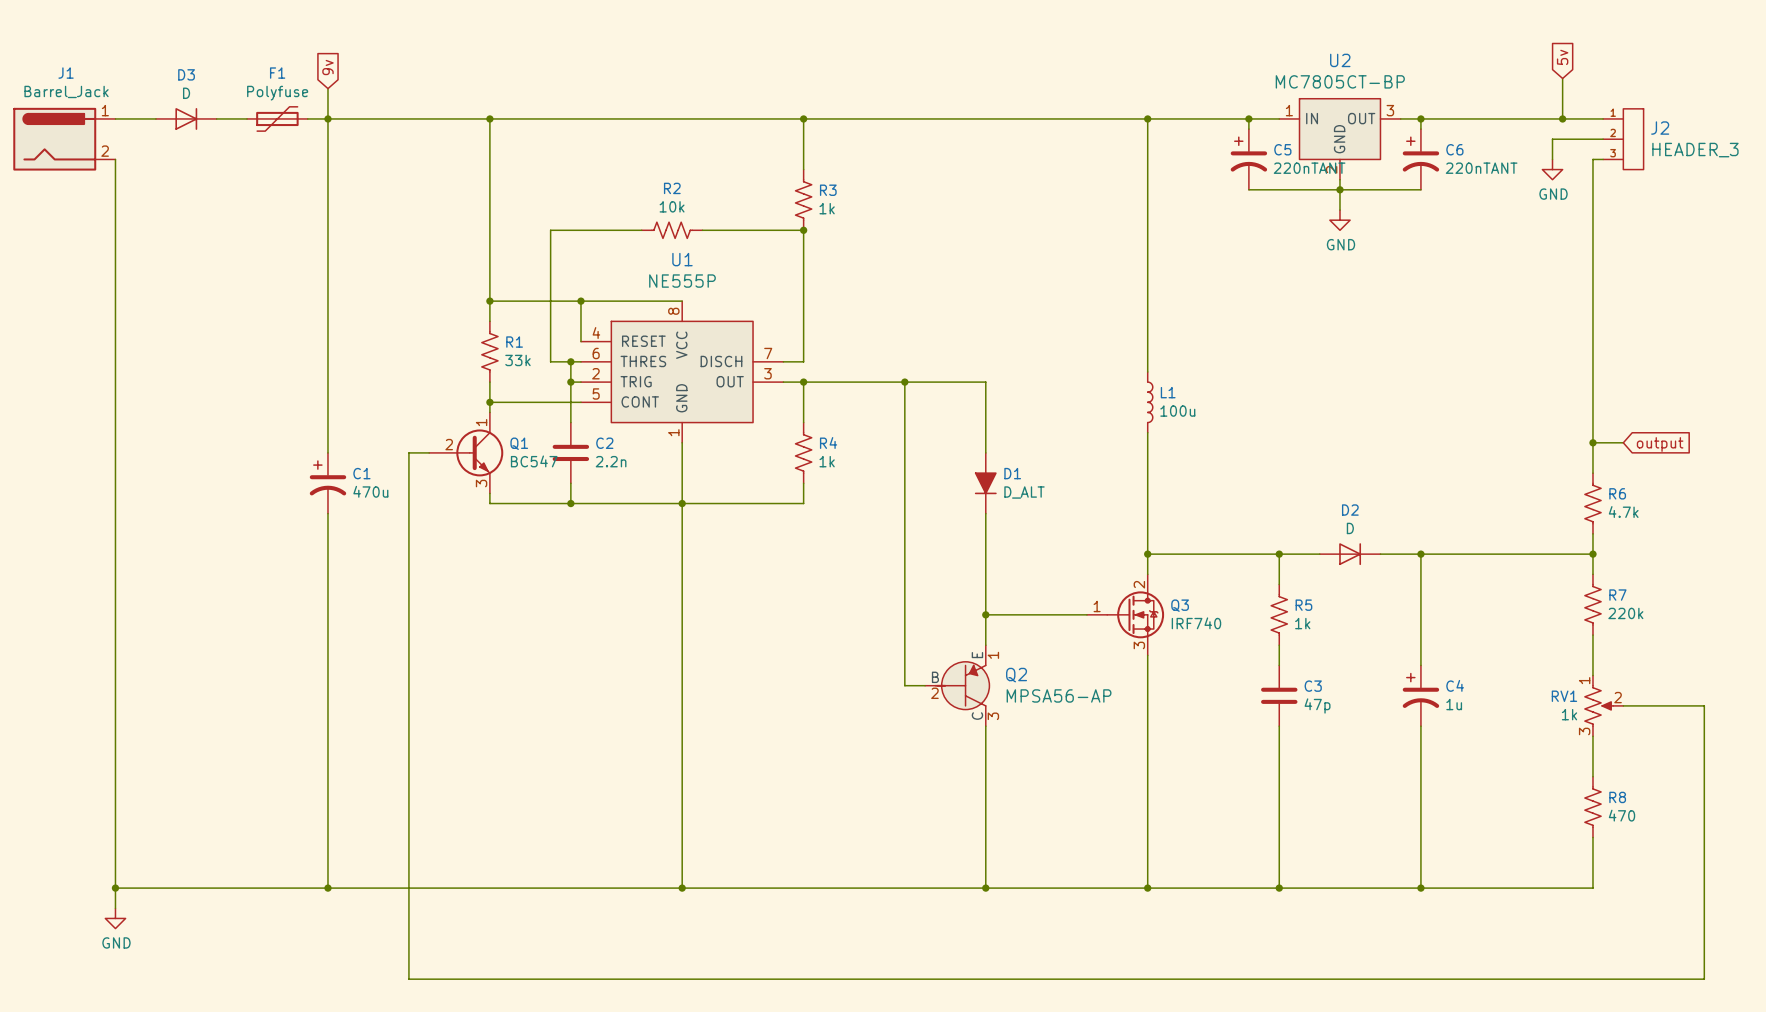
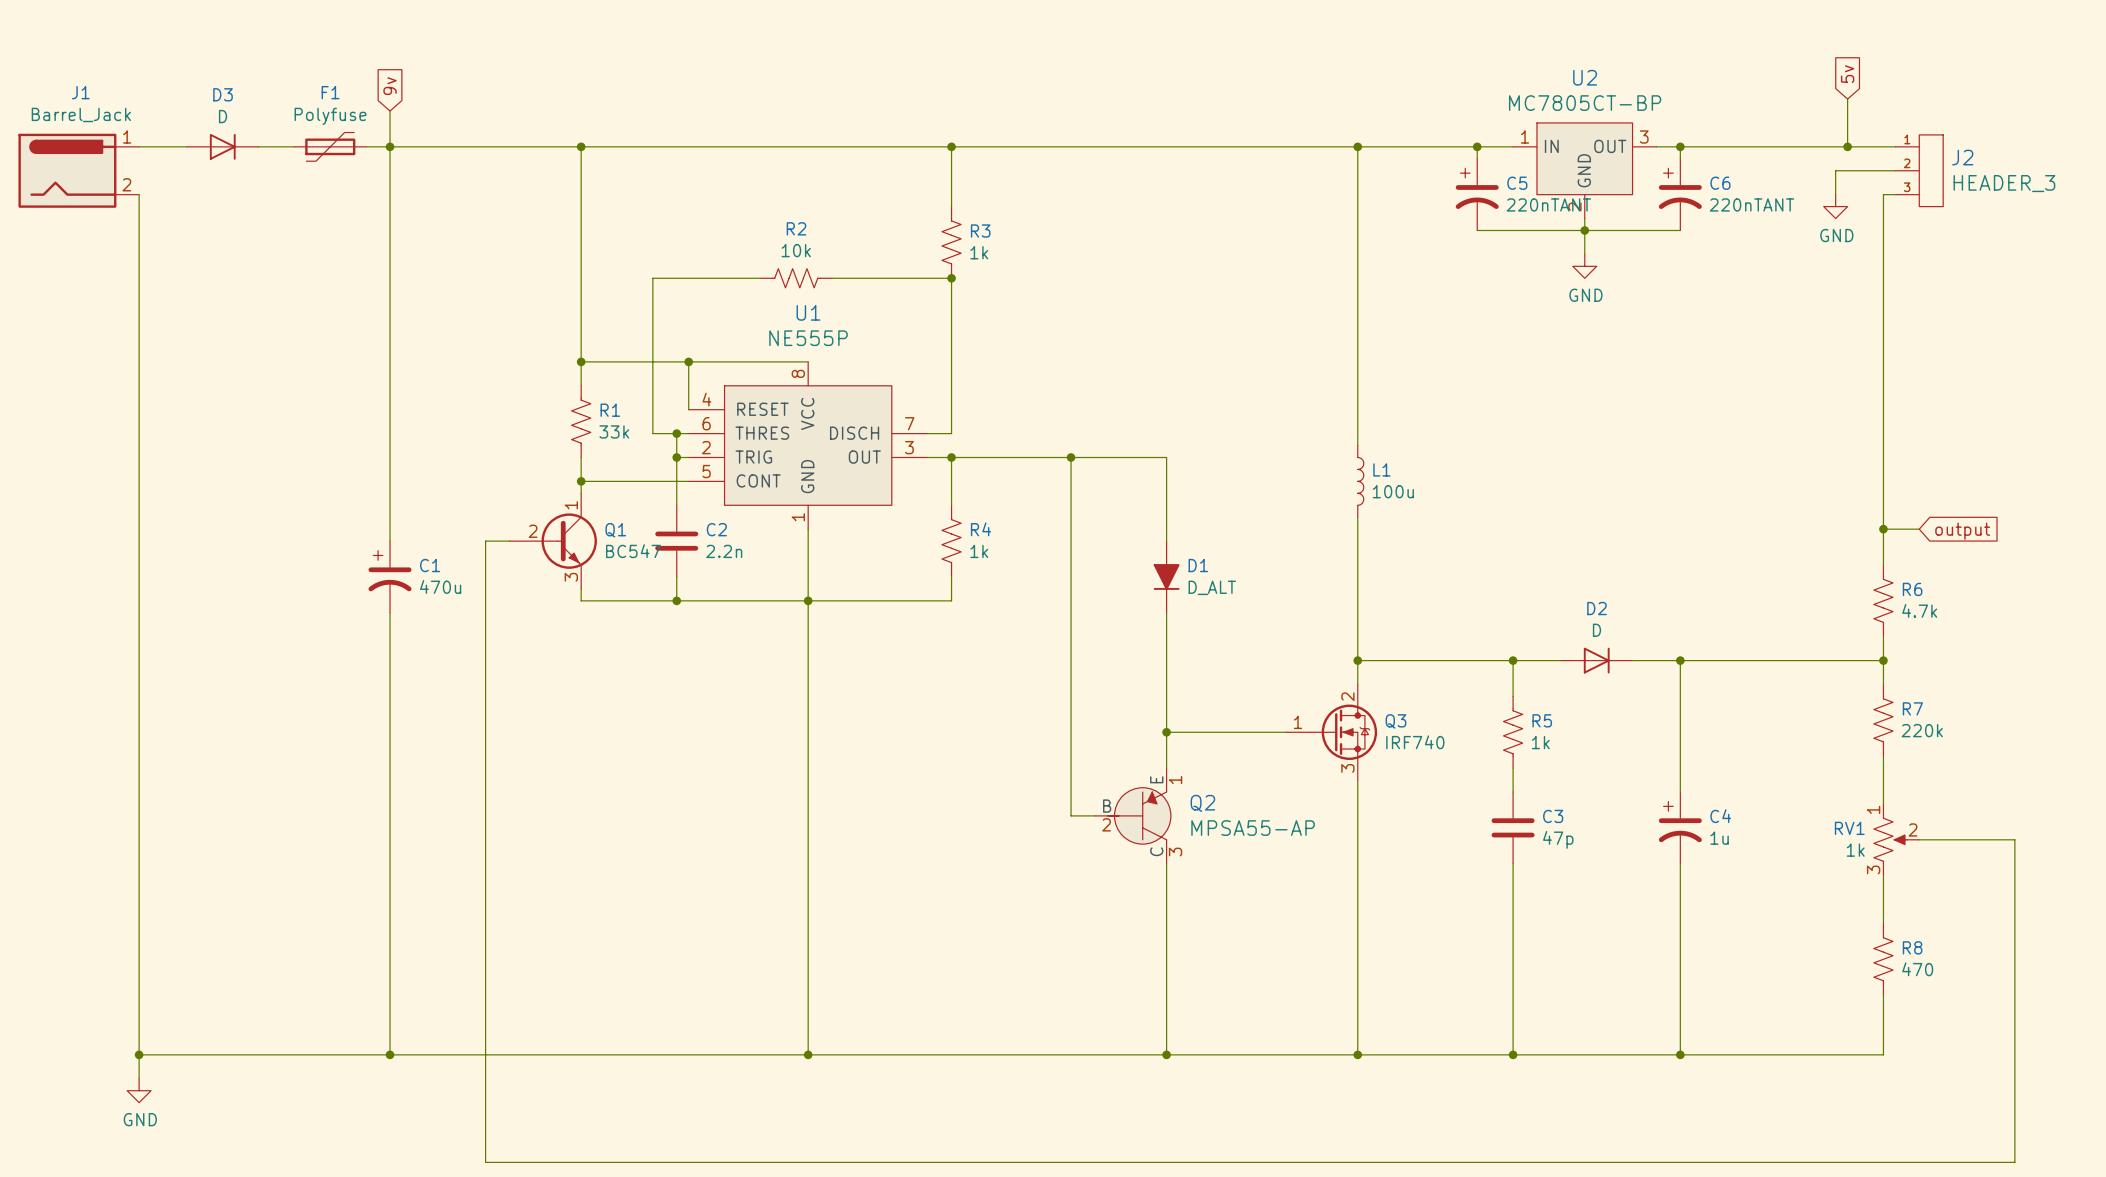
Q2 value: MPSA56-AP (1059, 695) -> MPSA55-AP (1253, 828)

